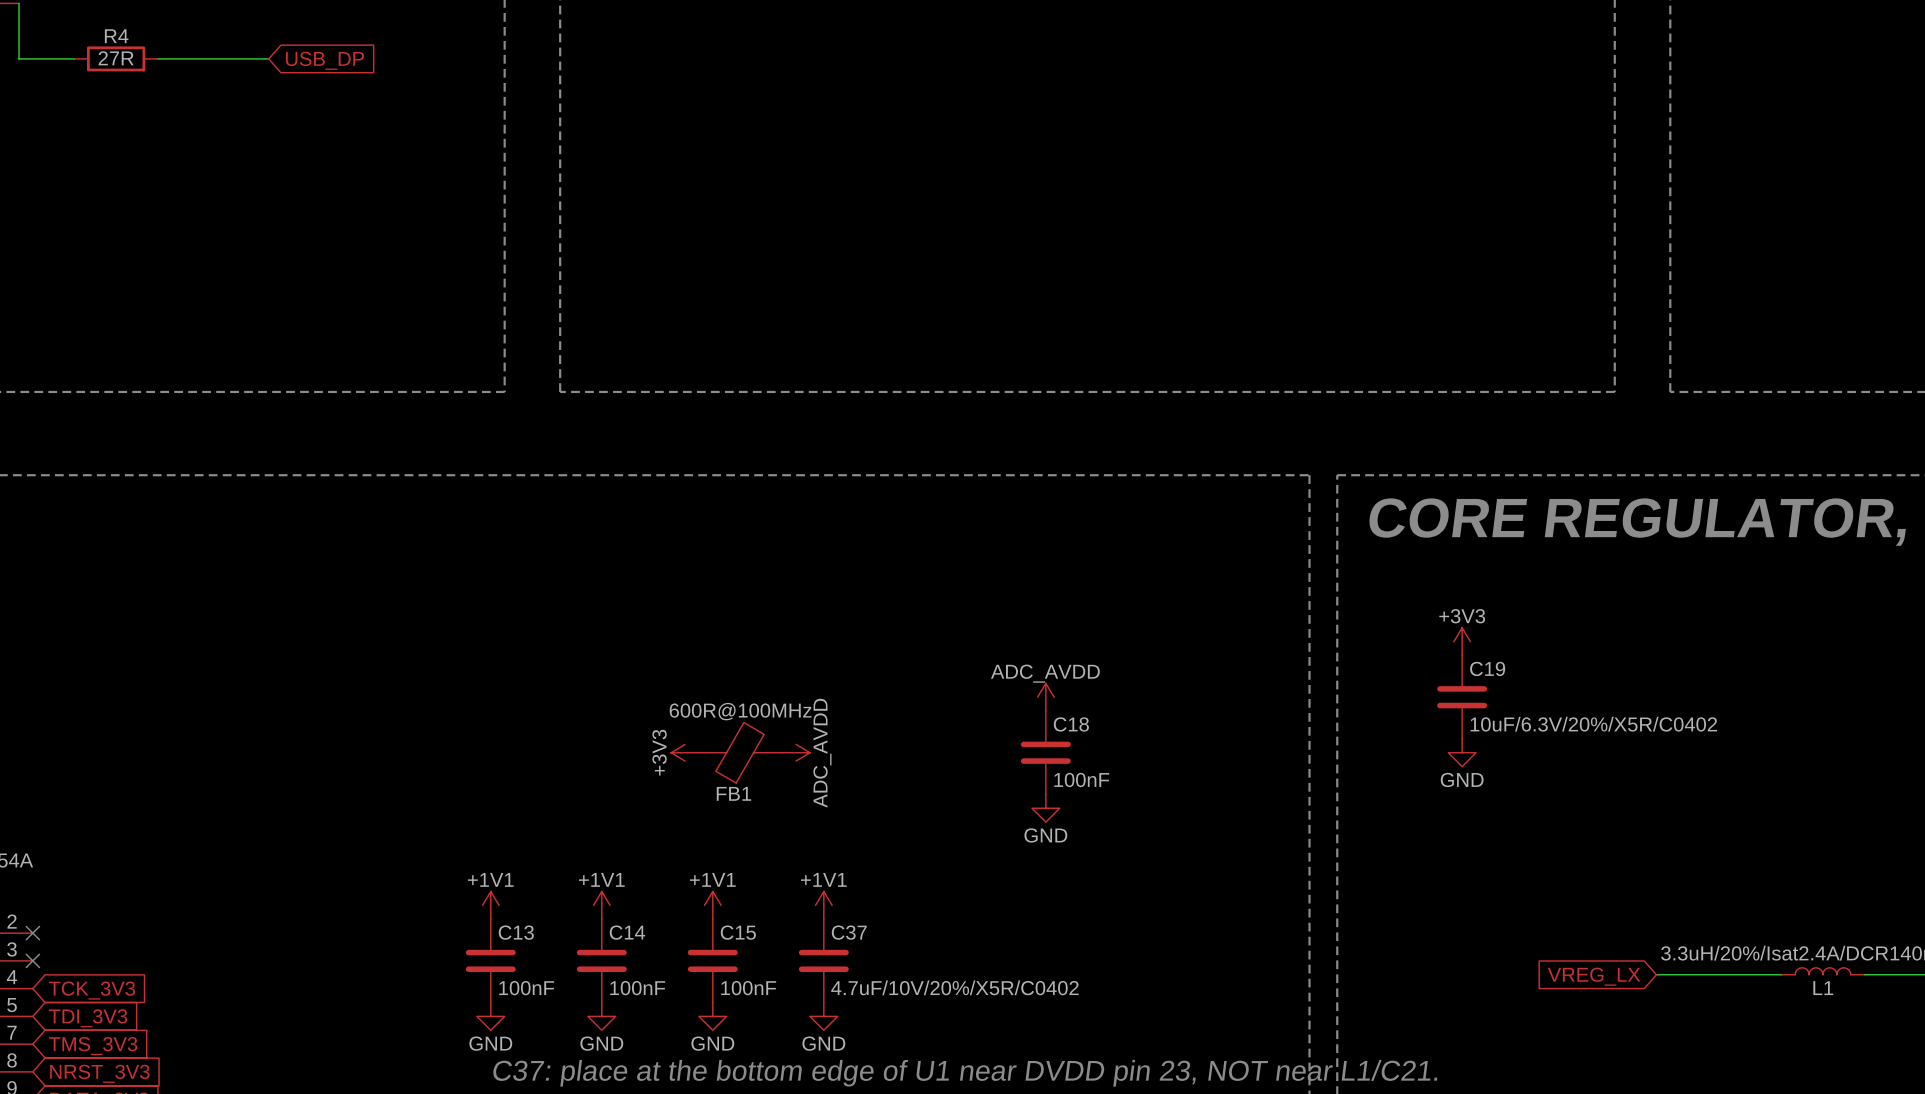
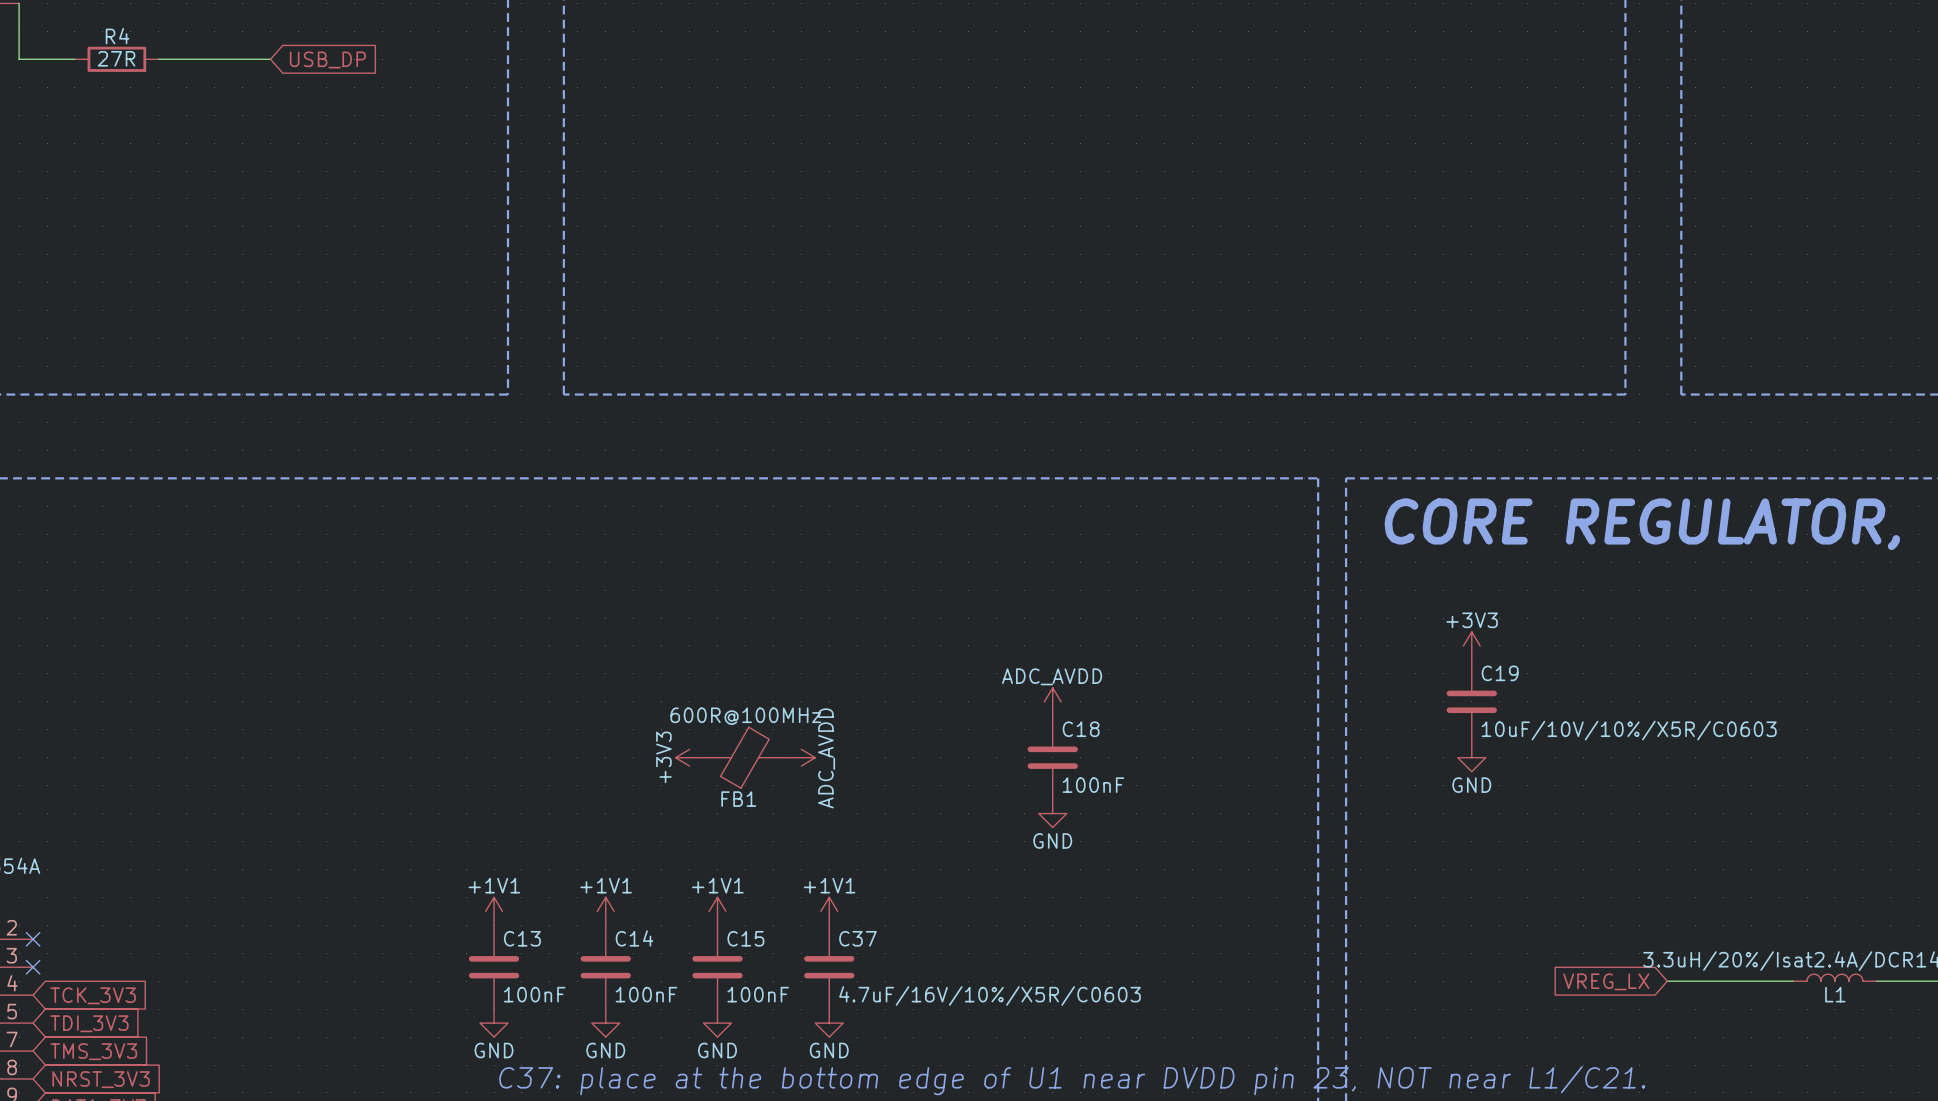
C19 value: 10uF/6.3V/20%/X5R/C0402 (1593, 724) -> 10uF/10V/10%/X5R/C0603 (1629, 730)
C37 value: 4.7uF/10V/20%/X5R/C0402 (954, 987) -> 4.7uF/16V/10%/X5R/C0603 (989, 995)

